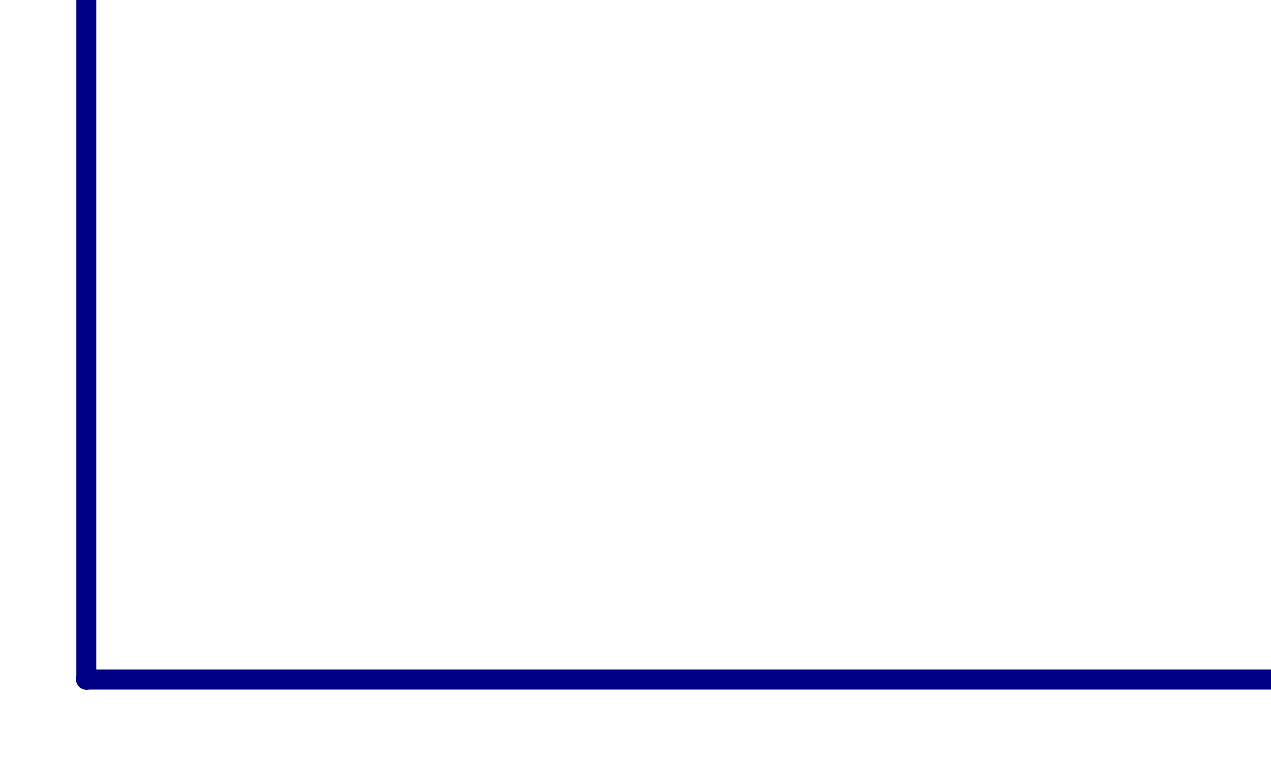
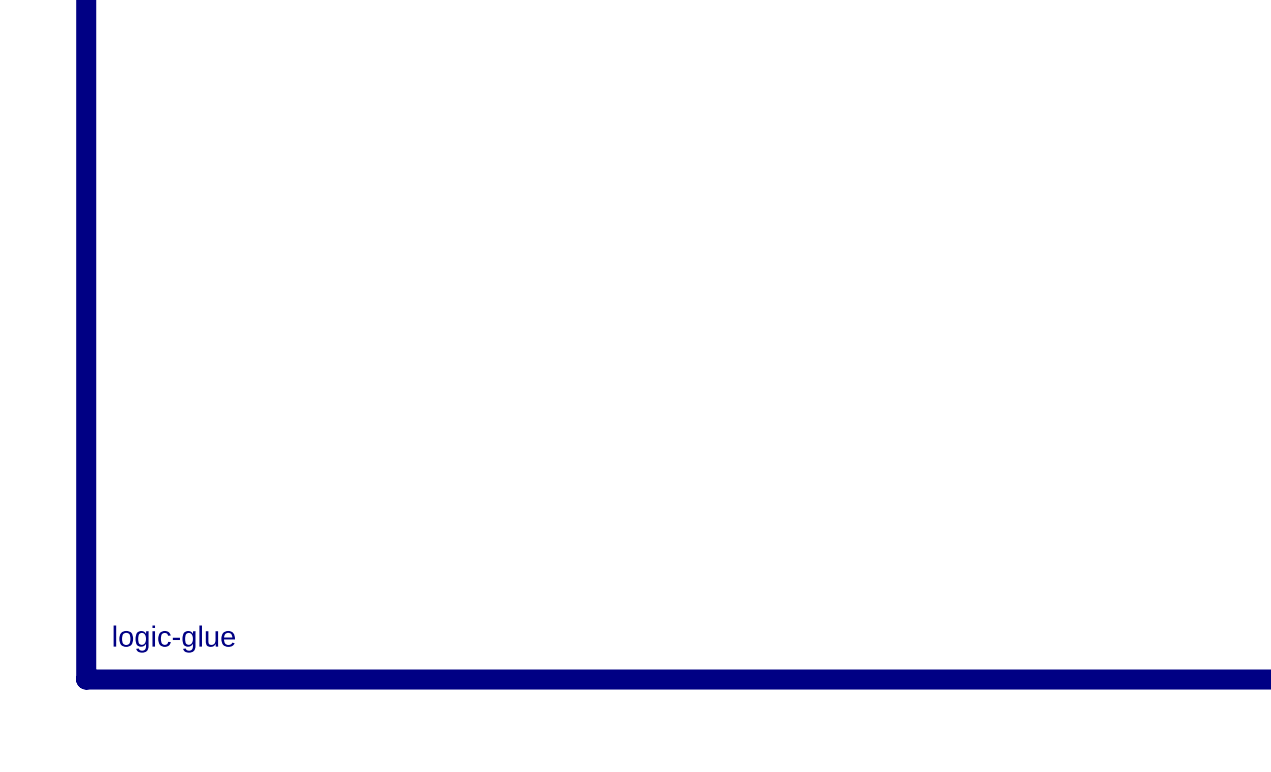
text: none -> logic-glue (174, 639)

